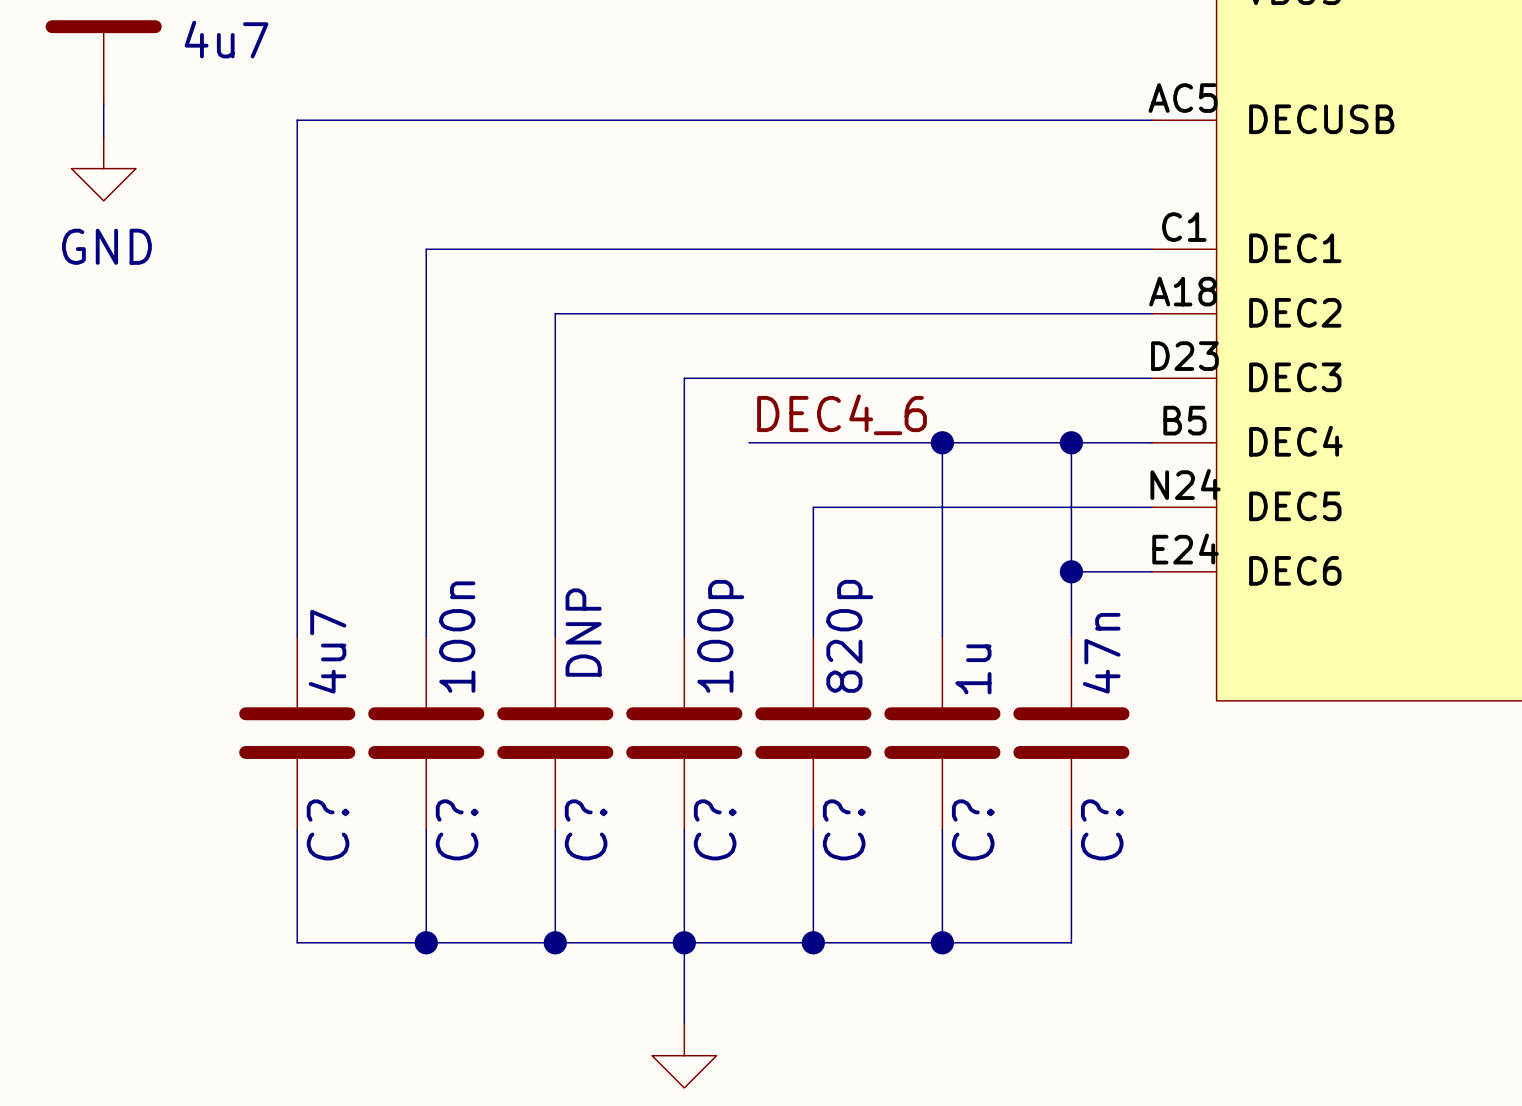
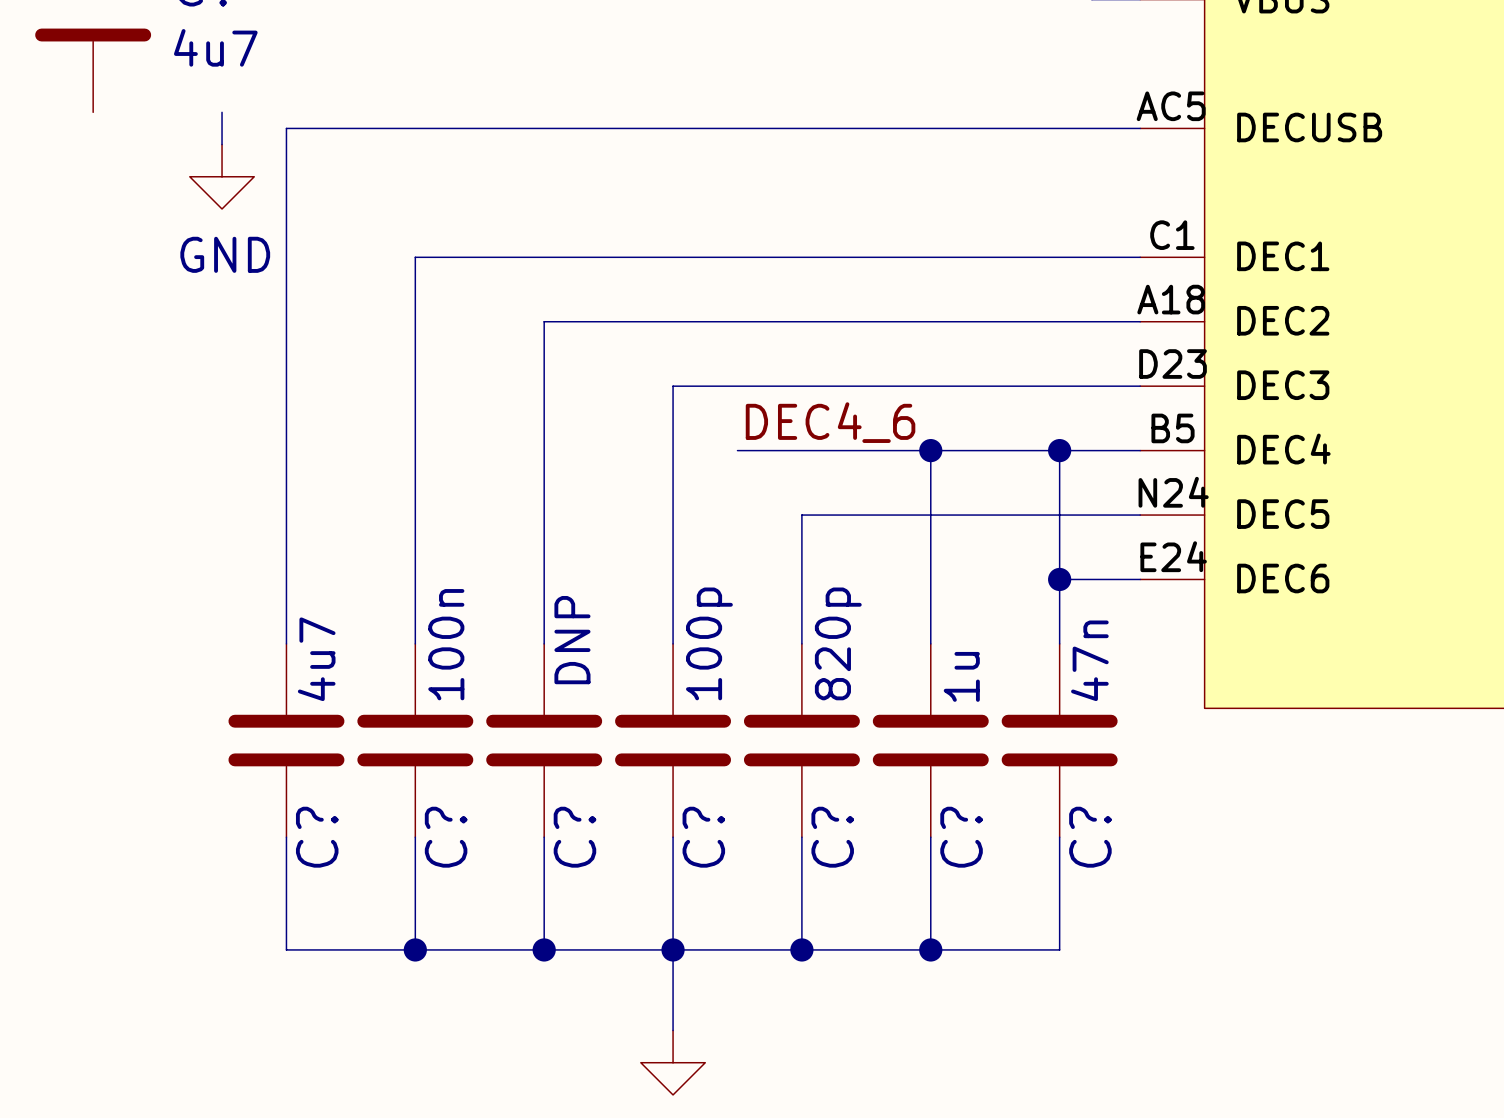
wire: (103, 104) (103, 136) -> (222, 112) (222, 144)
power symbol position: GND (103, 168) -> GND (222, 176)

